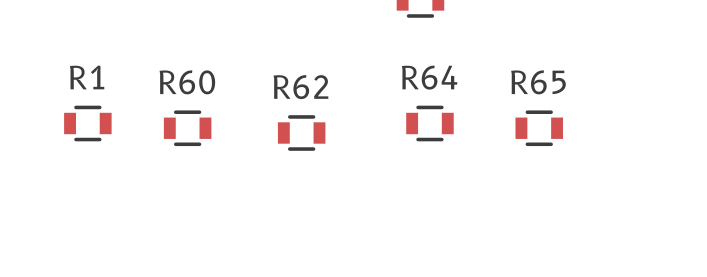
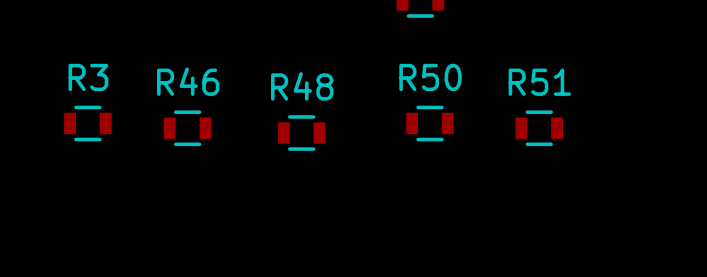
R1 name: R1 (87, 77) -> R3 (88, 77)
R64 name: R64 (429, 77) -> R50 (430, 77)
R60 name: R60 (187, 82) -> R46 (188, 81)
R65 name: R65 (538, 82) -> R51 (539, 82)
R62 name: R62 (300, 87) -> R48 (302, 86)

